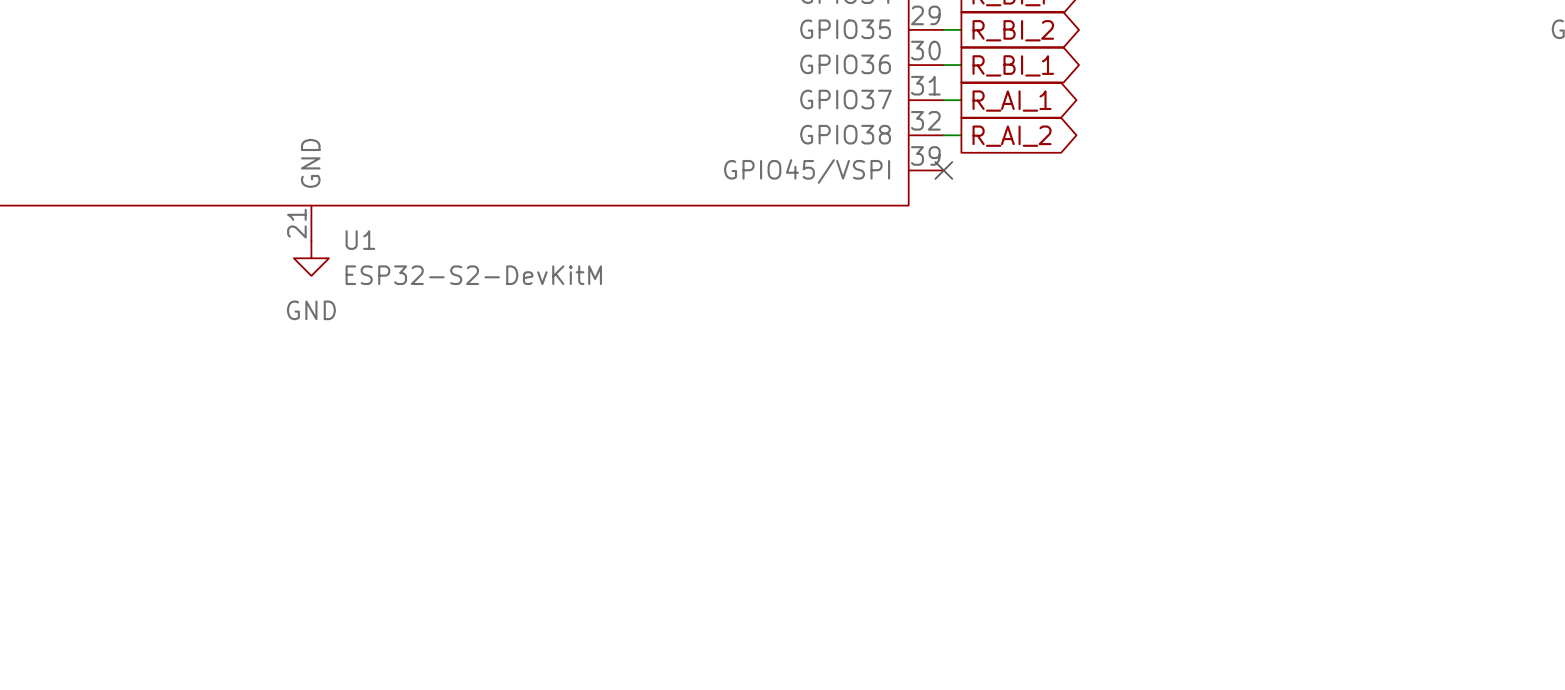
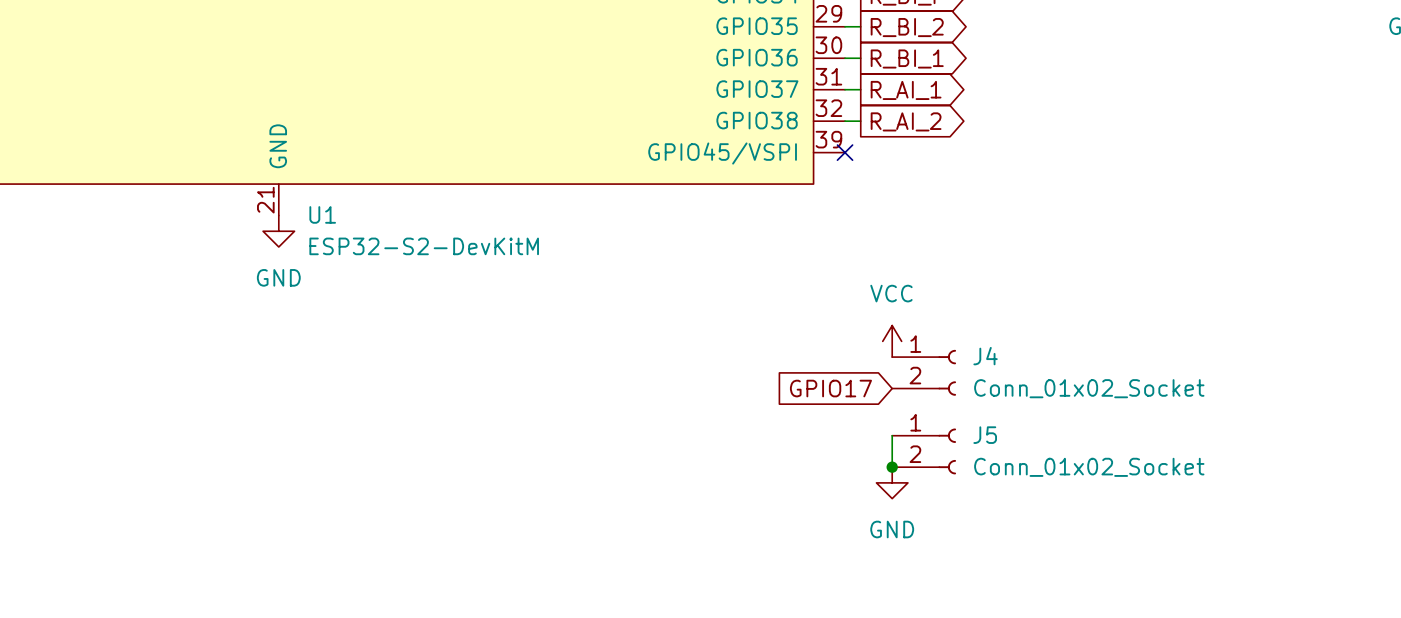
power symbol: none -> VCC (892, 341)
J4: none -> Conn_01x02_Socket (924, 372)
global label: none -> GPIO17 (830, 388)
wire: none -> (892, 435) (892, 467)
J5: none -> Conn_01x02_Socket (924, 451)
junction: none -> (892, 467)
power symbol: none -> GND (892, 482)

